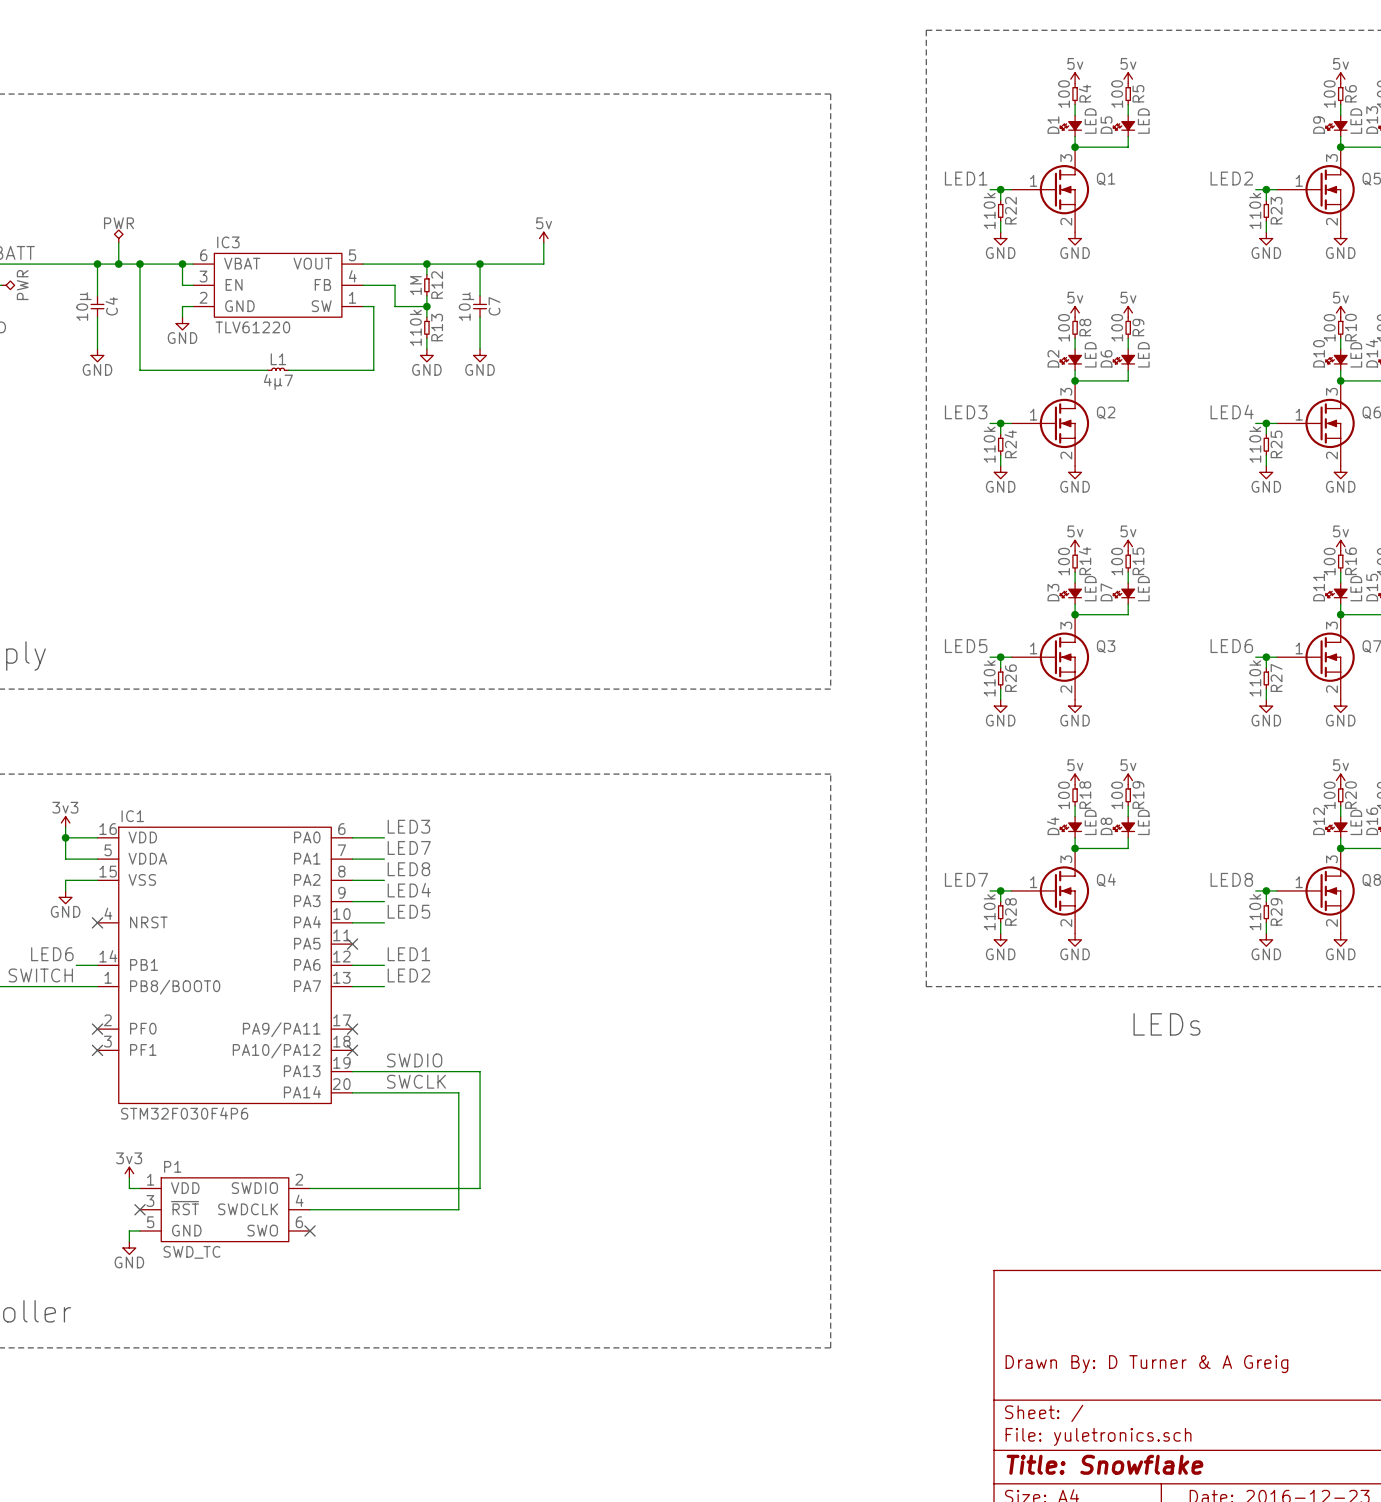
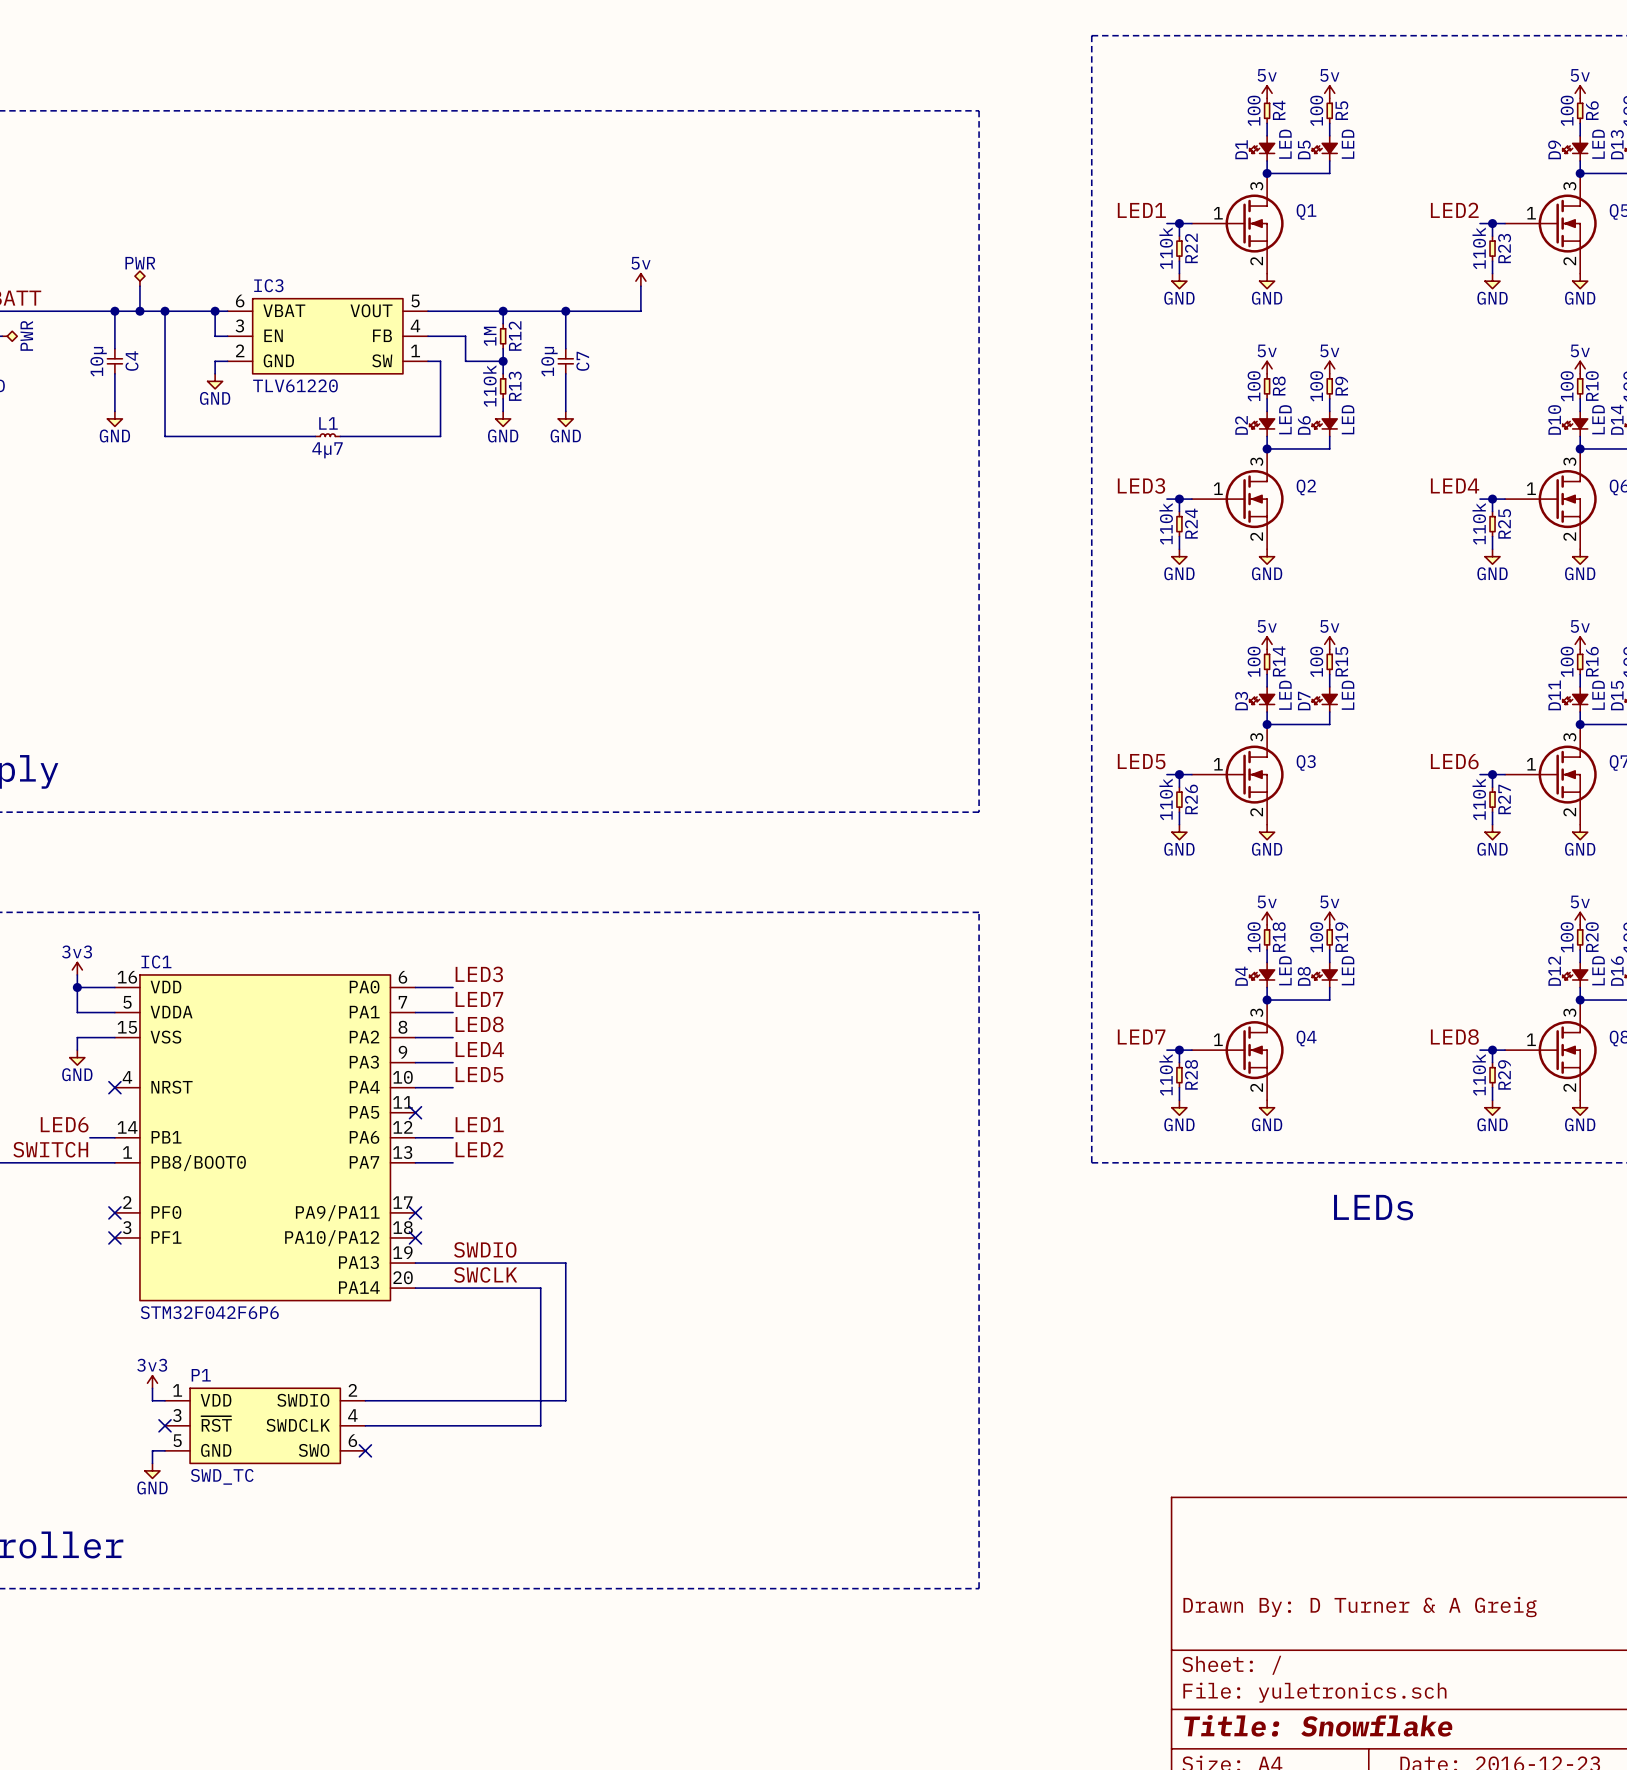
IC1 value: STM32F030F4P6 (184, 1113) -> STM32F042F6P6 (209, 1312)

